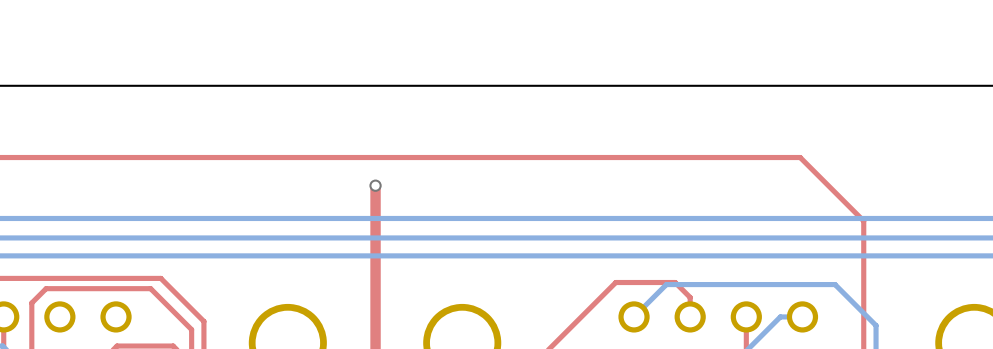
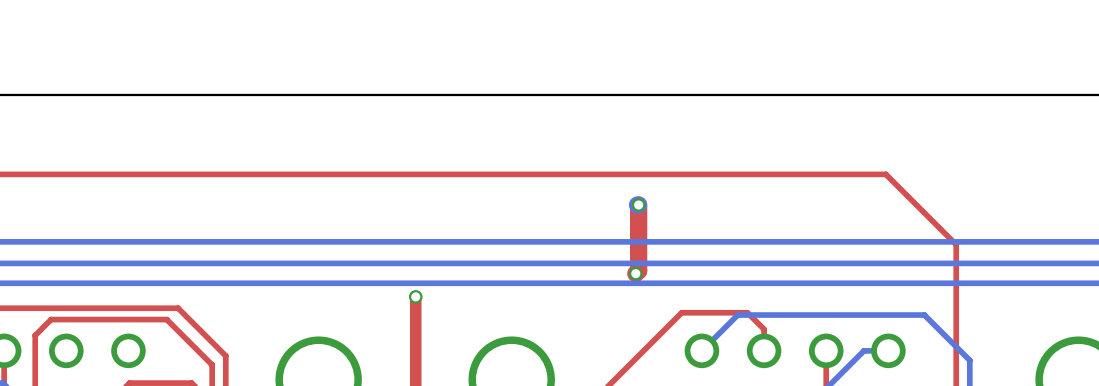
top track: (375, 185) (375, 268) -> none
via position: (375, 185) -> (415, 296)
top track: none -> (638, 205) (638, 270) (635, 273)
bottom track: none -> (638, 205) (637, 205)
via: none -> (638, 205)
via: none -> (635, 273)

